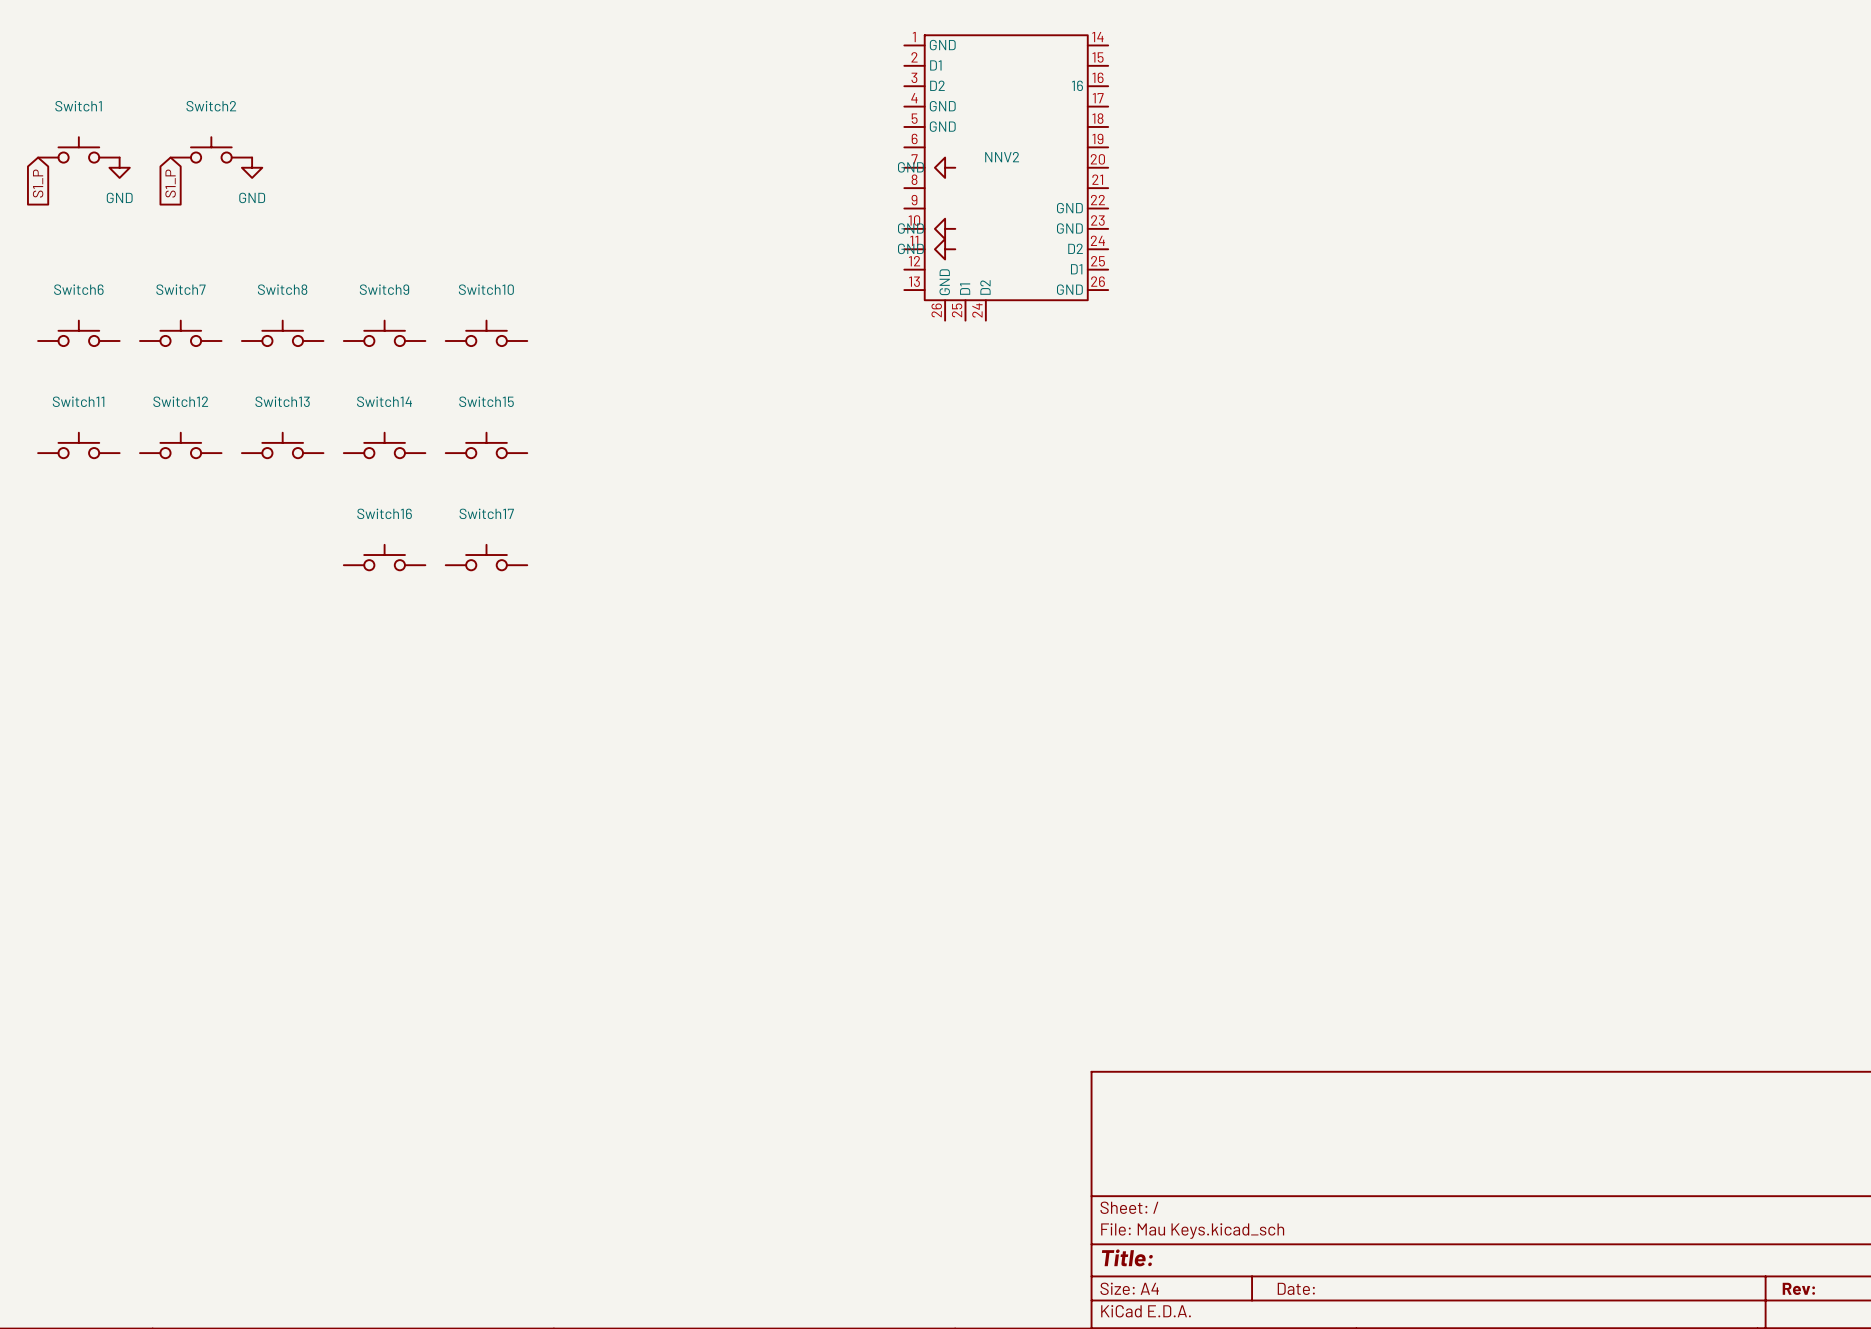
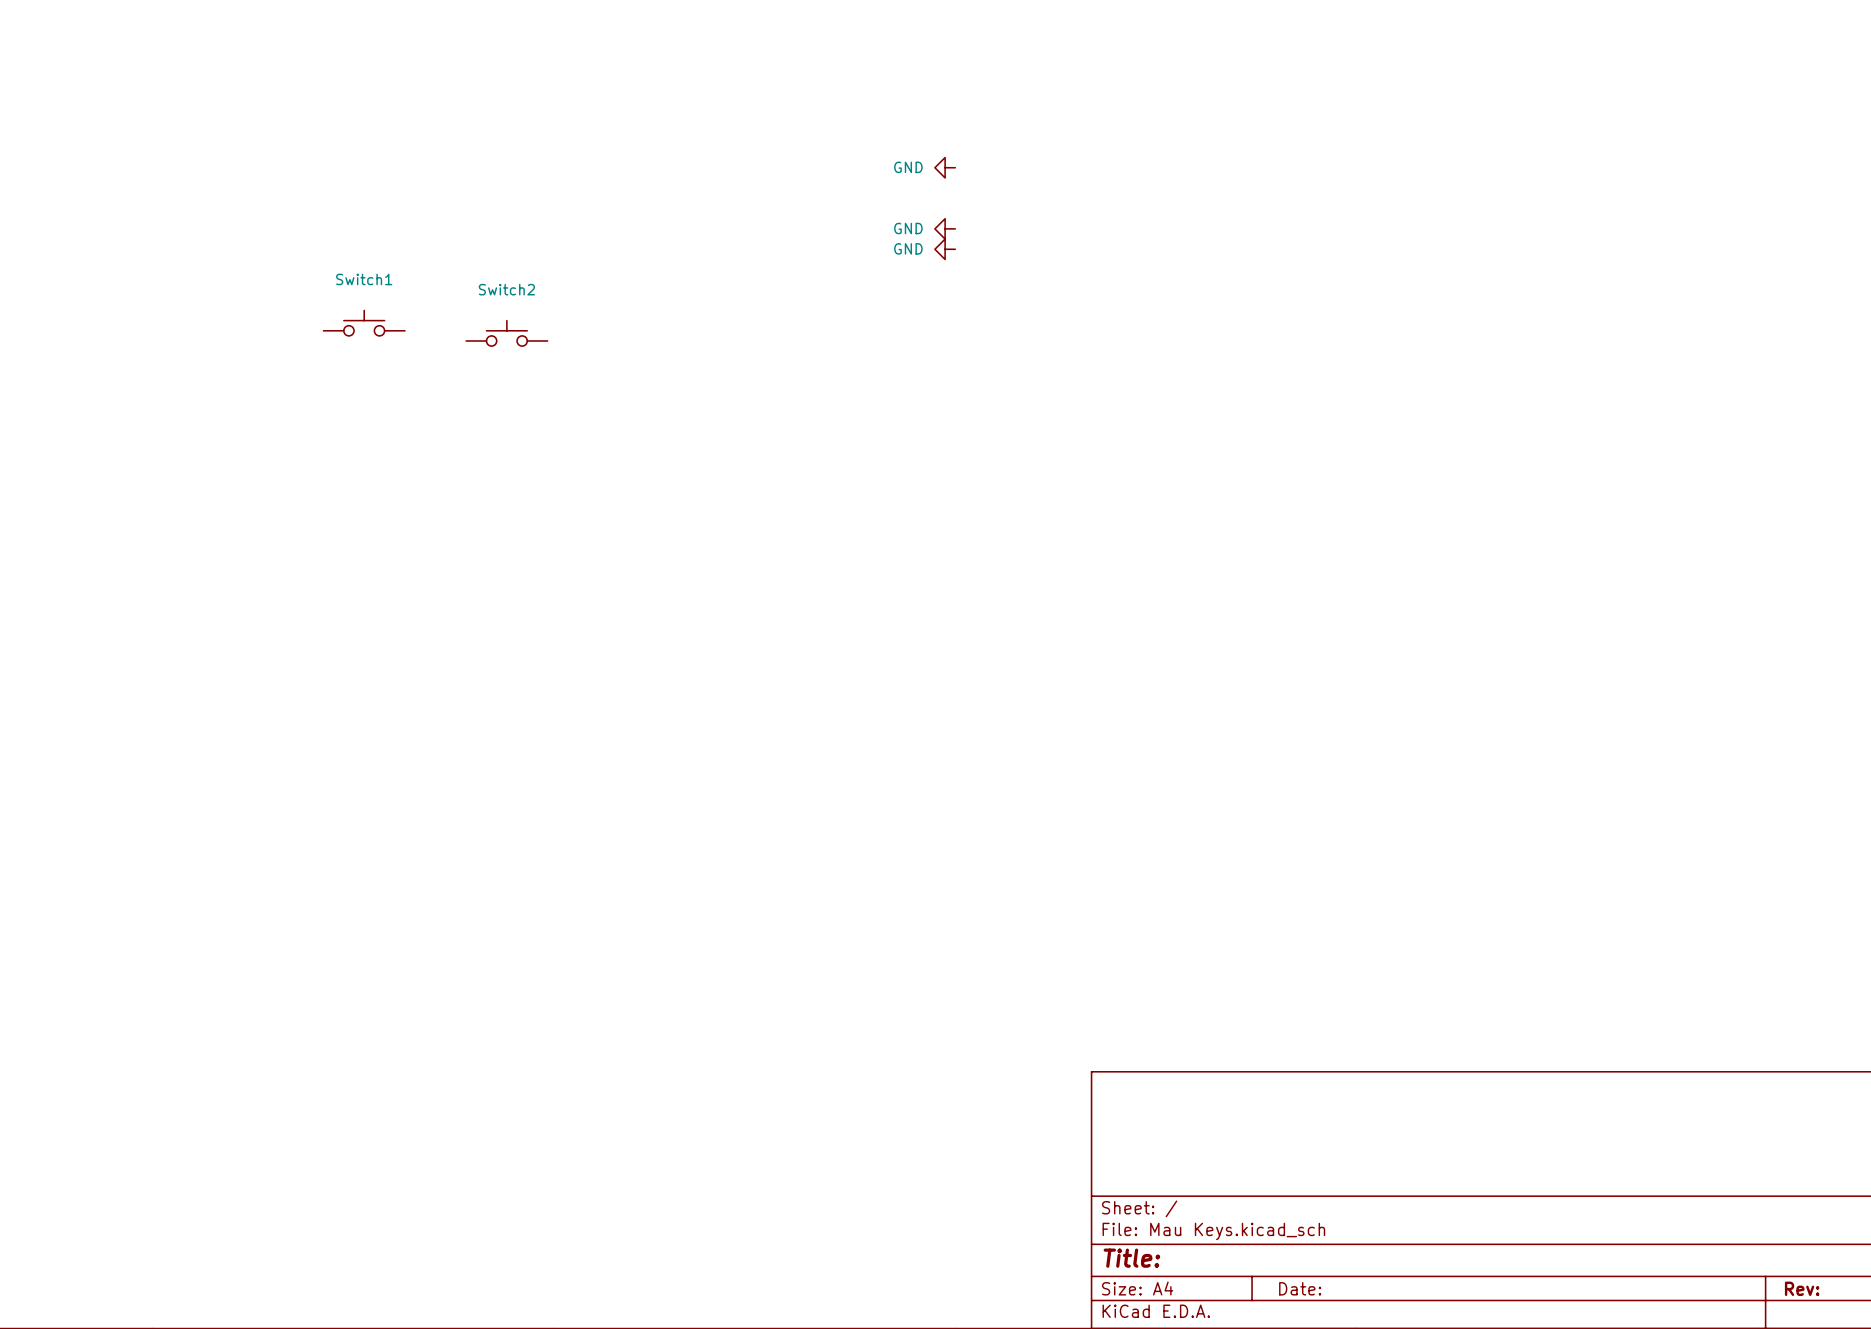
Switch1 position: (78, 149) -> (364, 323)
Switch2 position: (211, 149) -> (506, 333)
power symbol: GND (119, 167) -> none
power symbol: GND (252, 167) -> none
NNV2: (1006, 177) -> none
global label: S1_P (38, 183) -> none
global label: S1_P (170, 183) -> none
Switch6: (78, 333) -> none
Switch7: (180, 333) -> none
Switch8: (282, 333) -> none
Switch9: (384, 333) -> none
Switch10: (486, 333) -> none
Switch11: (78, 445) -> none
Switch12: (180, 445) -> none
Switch13: (282, 445) -> none
Switch14: (384, 445) -> none
Switch15: (486, 445) -> none
Switch16: (384, 557) -> none
Switch17: (486, 557) -> none

